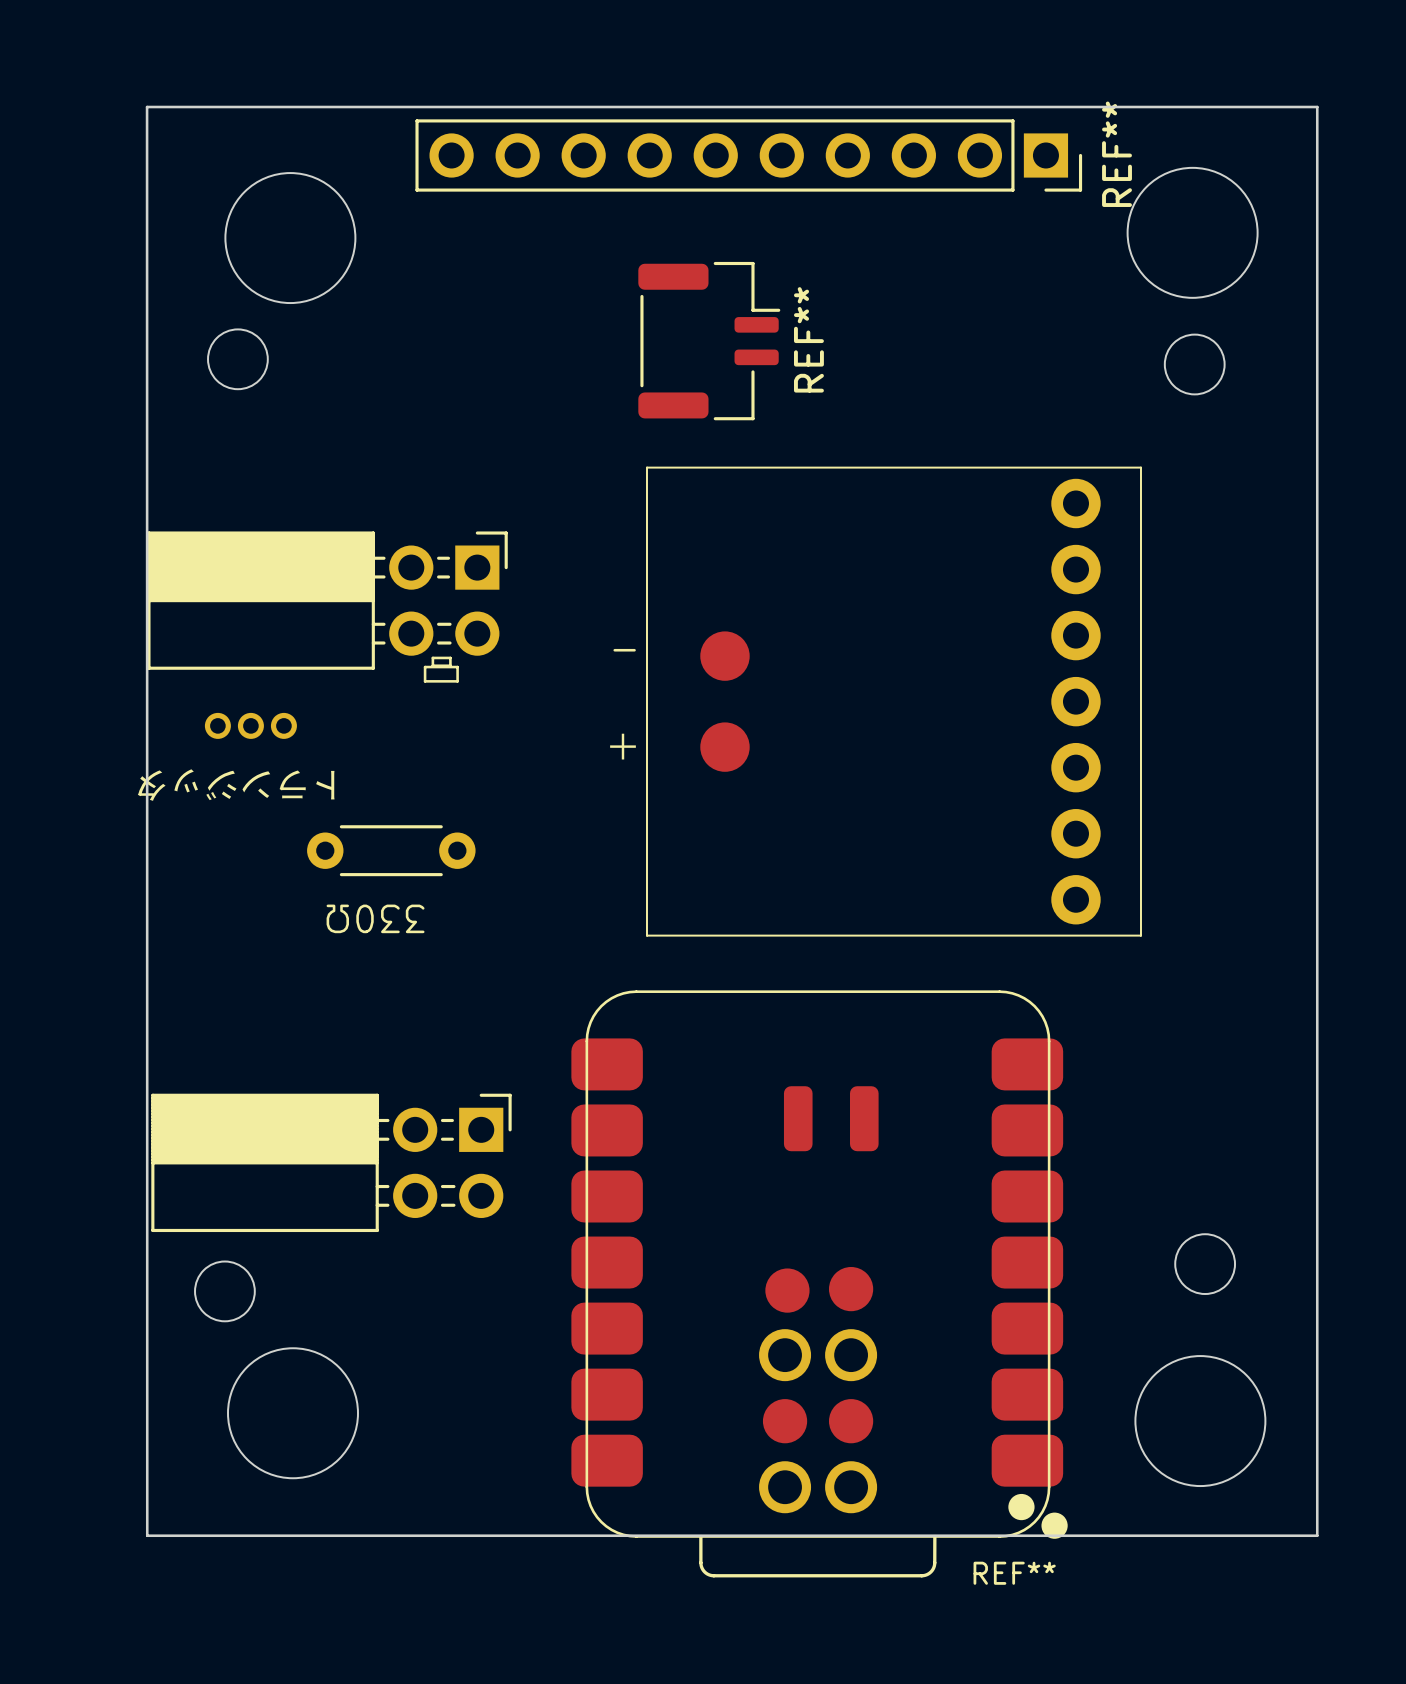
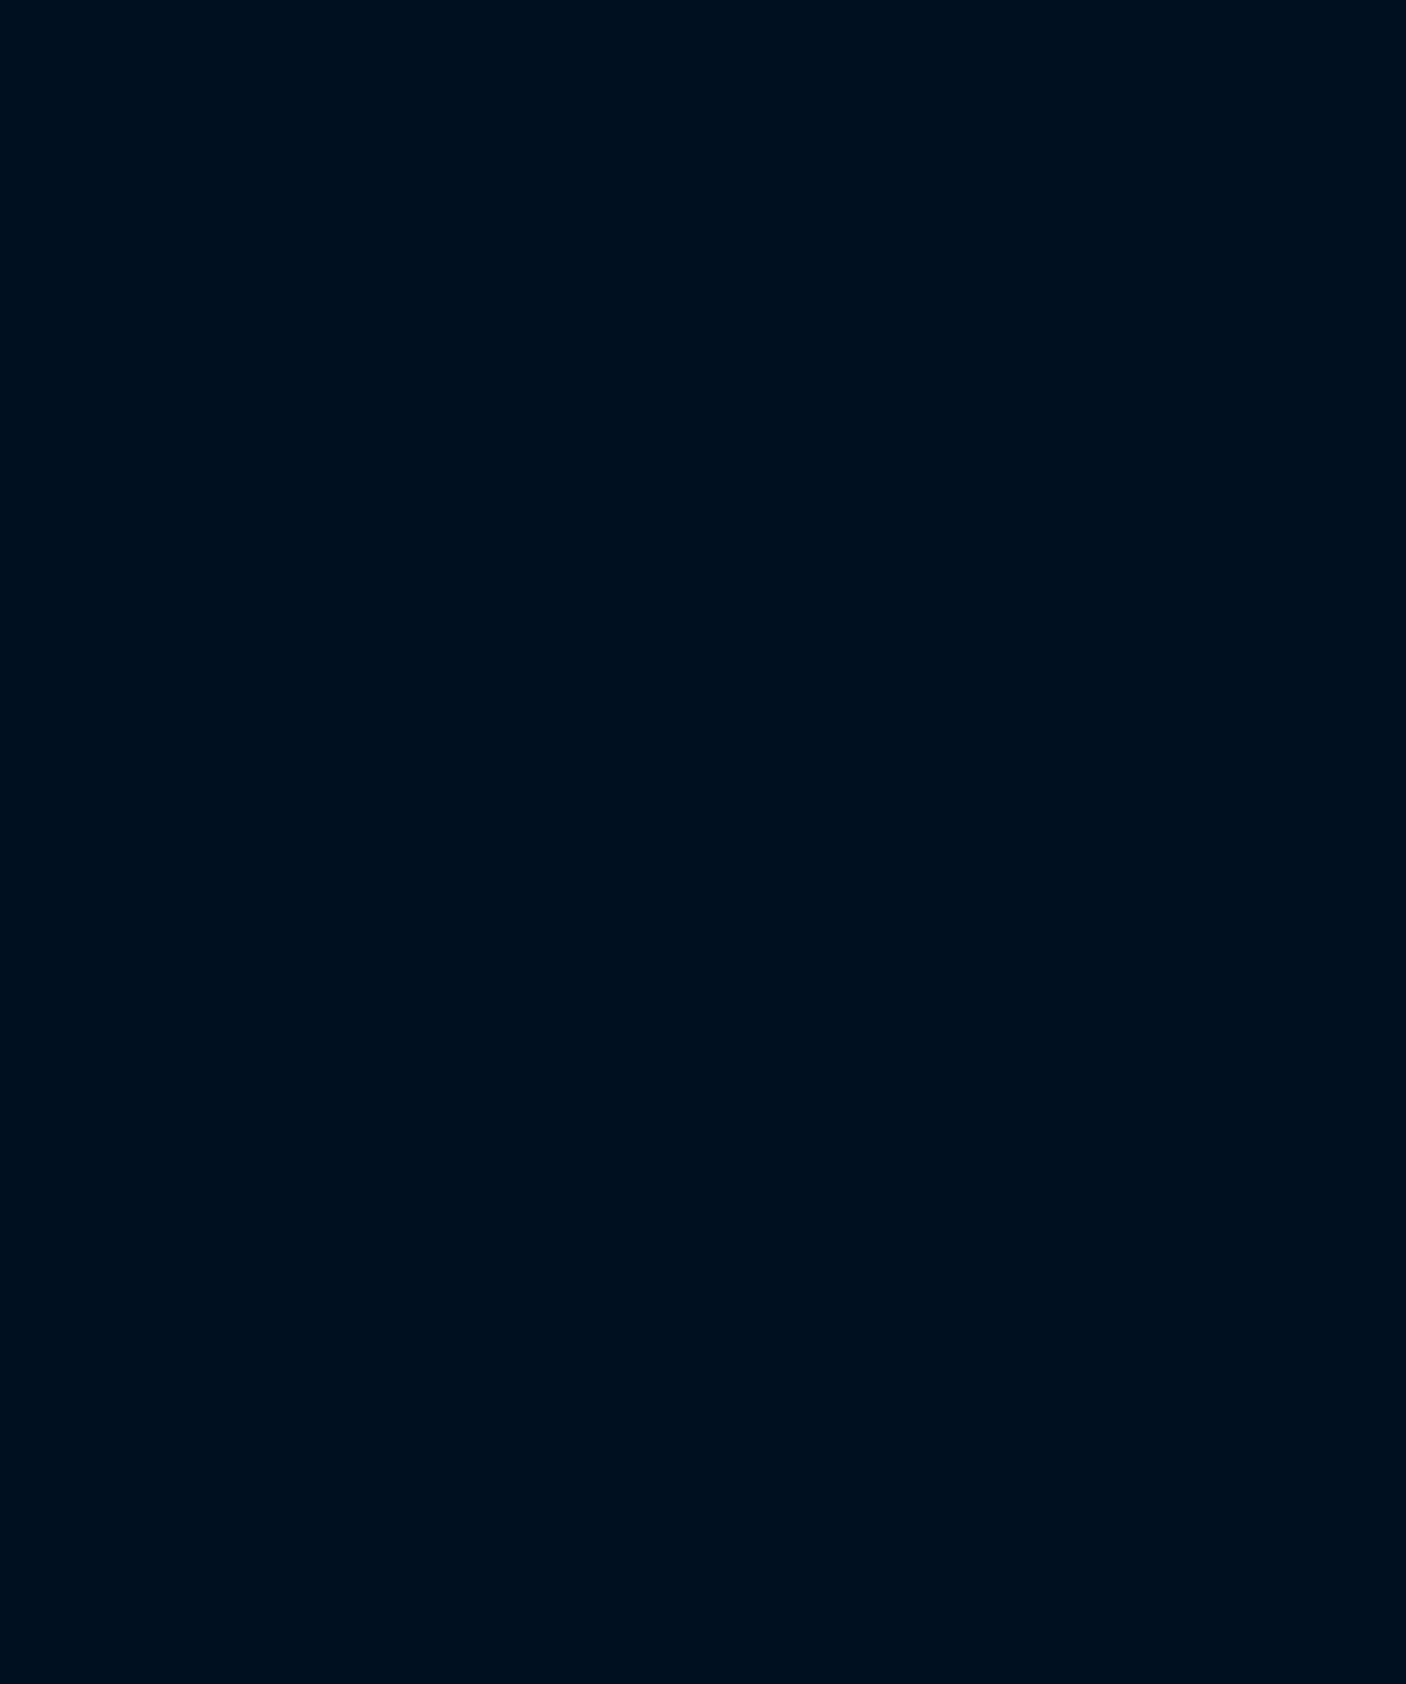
board edge: (147, 107) (147, 1535) (1317, 1535) (1317, 107) (147, 107) -> none
REF**: (748, 155) -> none
round board edge: [1126, 167, 1259, 299] -> none
round board edge: [224, 172, 357, 304] -> none
round board edge: [207, 328, 269, 390] -> none
round board edge: [1164, 333, 1226, 396] -> none
REF**: (709, 341) -> none
line: (646, 467) (1140, 467) (1140, 935) (646, 935) (646, 467) -> none
part: (1075, 503) -> none
part: (1075, 569) -> none
part: (327, 600) -> none
part: (1075, 635) -> none
text: - (624, 650) -> none
part: (724, 656) -> none
line: (432, 657) (450, 657) (450, 665) (432, 665) (432, 657) -> none
line: (425, 667) (457, 667) (457, 681) (425, 681) (425, 667) -> none
part: (1075, 701) -> none
part: (217, 725) -> none
part: (250, 725) -> none
part: (283, 725) -> none
text: ＋ (622, 746) -> none
part: (724, 747) -> none
part: (1075, 767) -> none
text: トランジッタ (236, 785) -> none
part: (1075, 833) -> none
part: (391, 850) -> none
part: (1075, 899) -> none
text: 330Ω (375, 918) -> none
part: (331, 1162) -> none
round board edge: [1174, 1233, 1236, 1295] -> none
round board edge: [194, 1260, 256, 1322] -> none
REF**: (819, 1283) -> none
round board edge: [227, 1347, 359, 1479] -> none
round board edge: [1134, 1355, 1267, 1487] -> none

